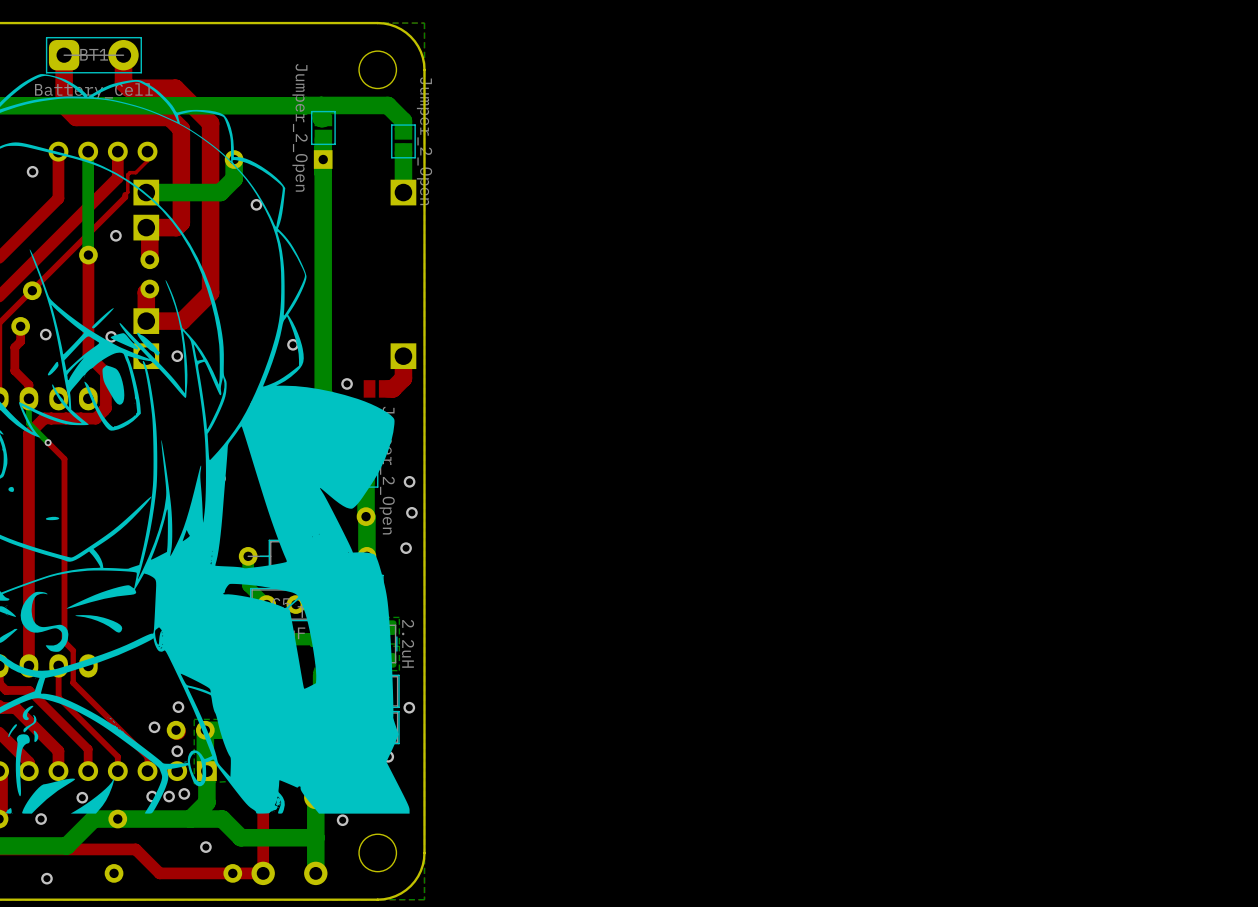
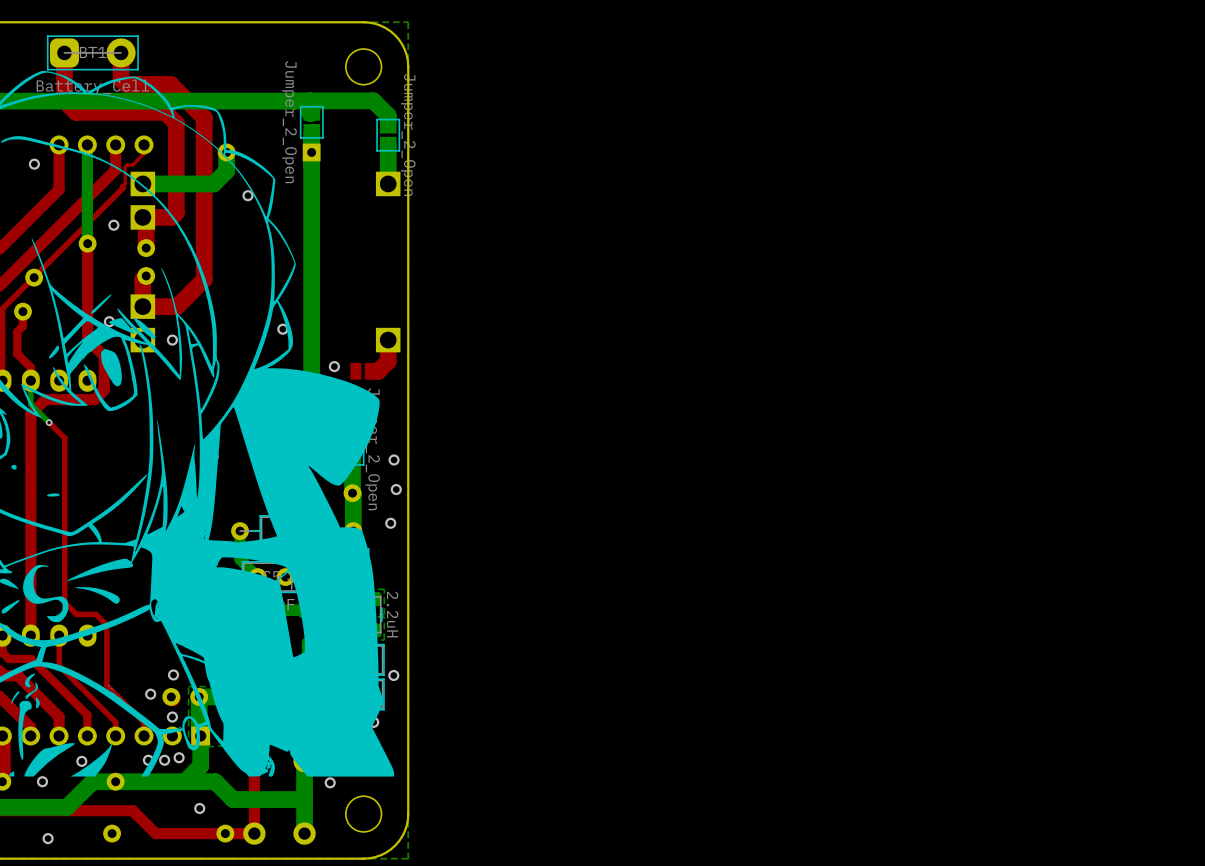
via: (45, 334) -> none
top track: (64, 631) (64, 641) (73, 650) (73, 682) (108, 718) -> (64, 602) (76, 614) (96, 614) (106, 625) (106, 685)

